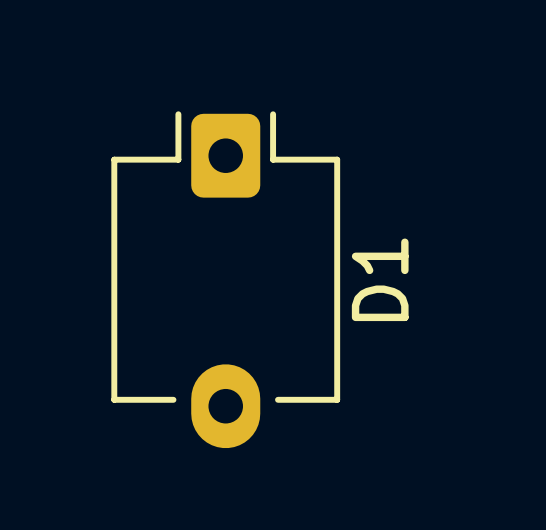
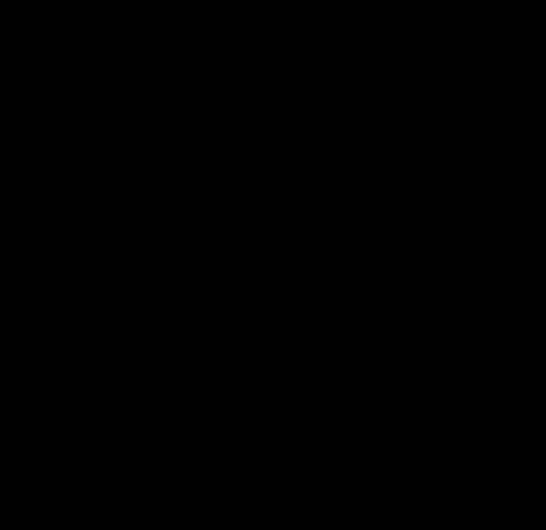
D1: (225, 279) -> none

